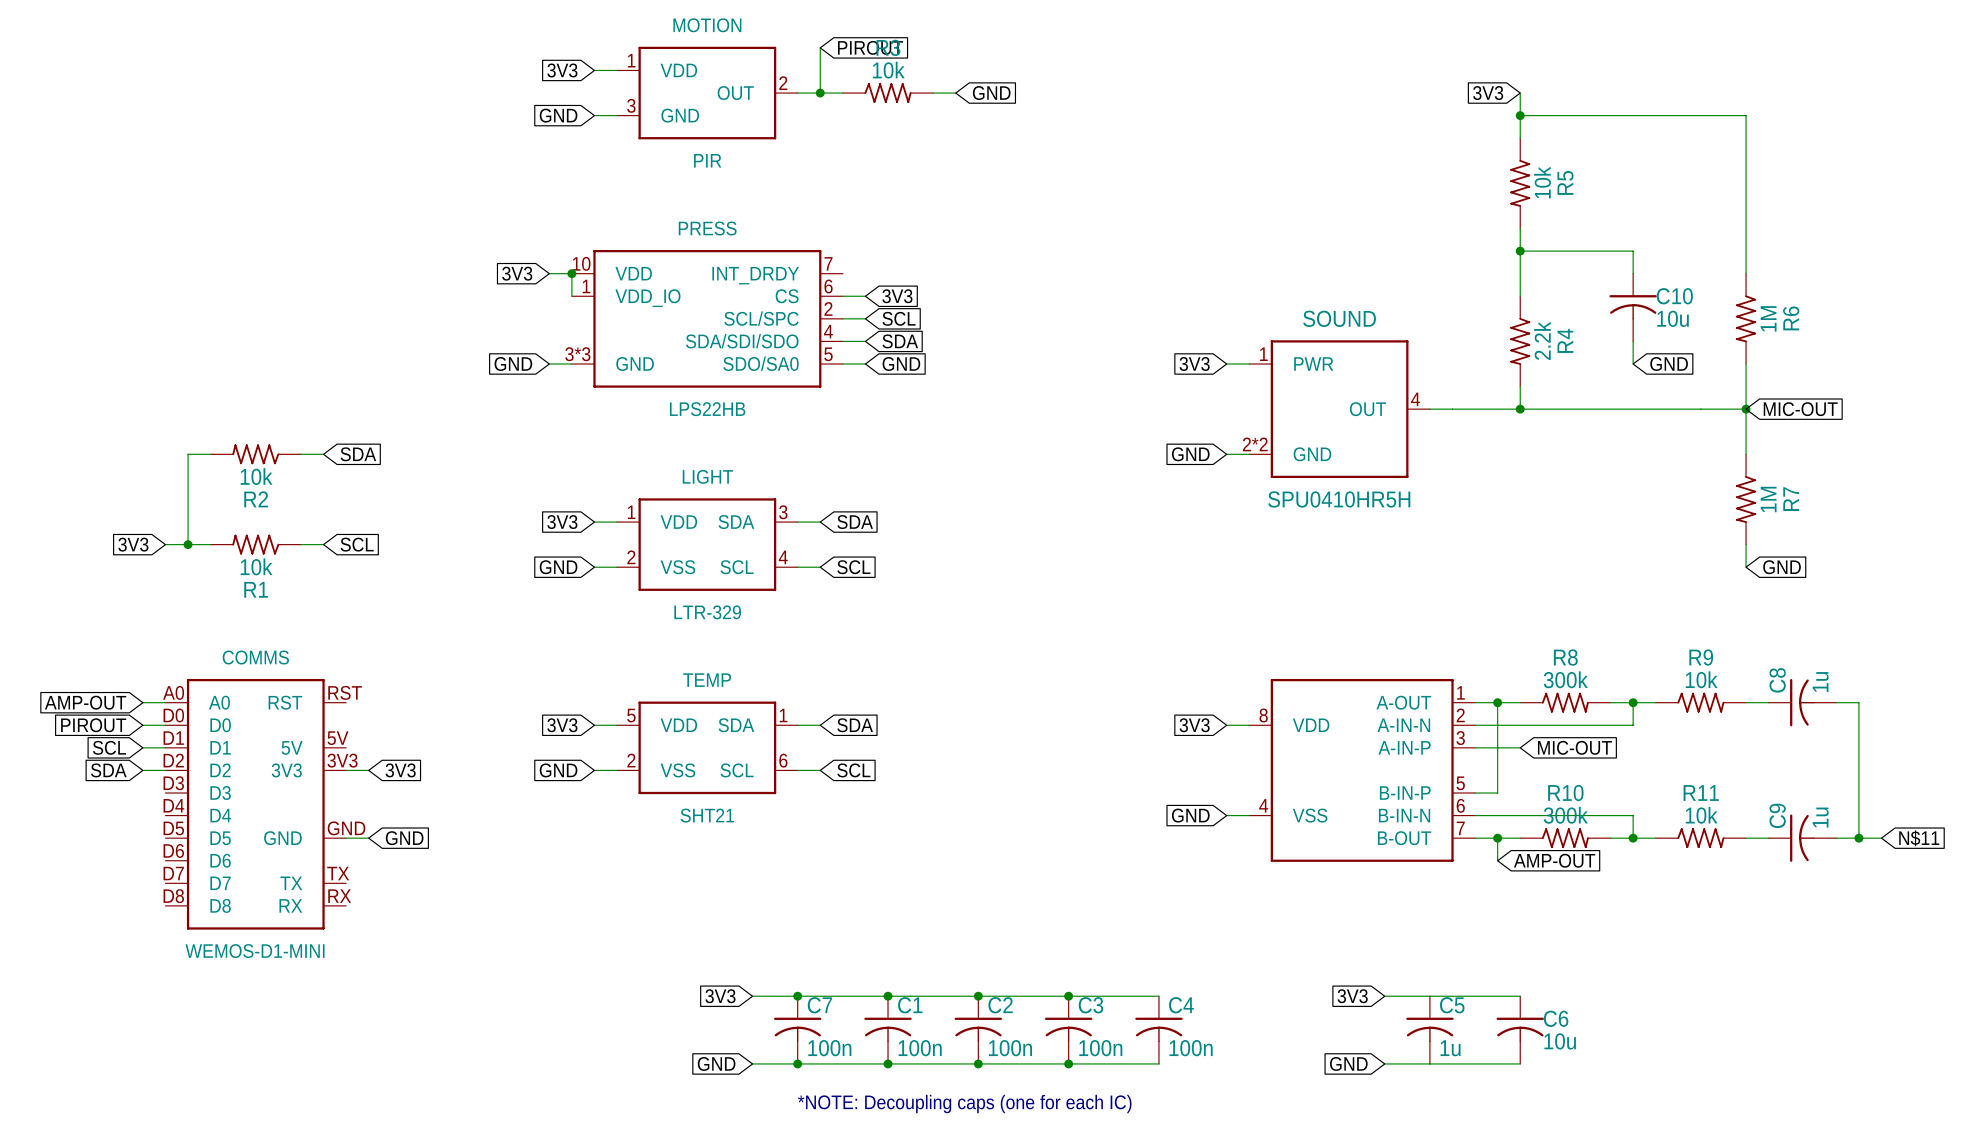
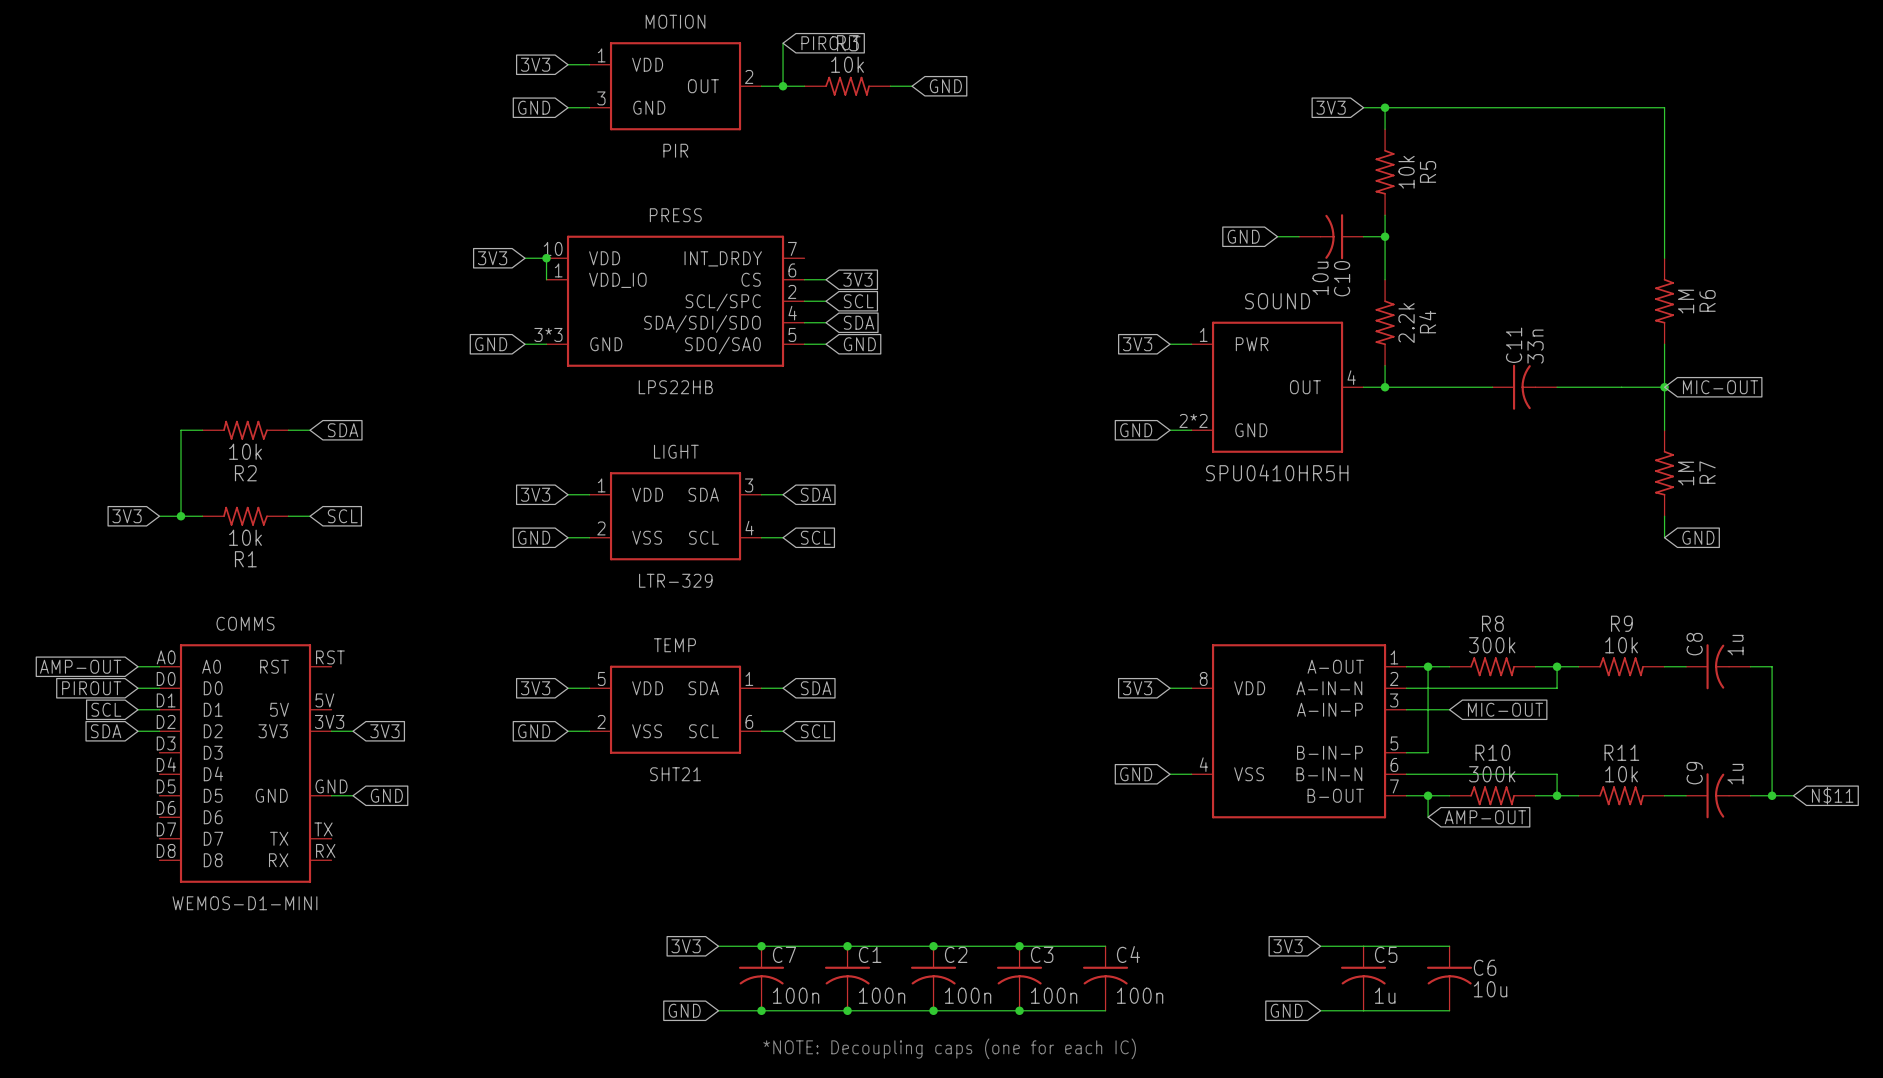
global label position: 3V3 (1488, 93) -> 3V3 (1331, 107)
wire: (1520, 93) (1520, 138) -> none
wire: none -> (1363, 107) (1449, 107)
wire: none -> (1385, 107) (1385, 129)
junction: none -> (1385, 107)
junction: (1520, 115) -> none
R5 position: (1520, 183) -> (1385, 172)
wire: (1520, 228) (1520, 296) -> (1385, 215) (1385, 279)
global label: none -> GND (1243, 236)
wire: none -> (1277, 236) (1299, 236)
wire: none -> (1363, 236) (1385, 236)
junction: none -> (1385, 236)
wire: (1520, 251) (1633, 251) (1633, 273) -> none
junction: (1520, 251) -> none
C10 rotation: 0° (1633, 307) -> 90° clockwise (1331, 236)
C10 position: (1633, 307) -> (1331, 236)
R4 position: (1520, 341) -> (1385, 322)
wire: (1633, 341) (1633, 363) -> none
global label: GND (1669, 363) -> none
wire: (1520, 386) (1520, 409) -> (1385, 365) (1385, 387)
junction: none -> (1385, 387)
junction: (1520, 409) -> none
C11: none -> 33n (1524, 387)

